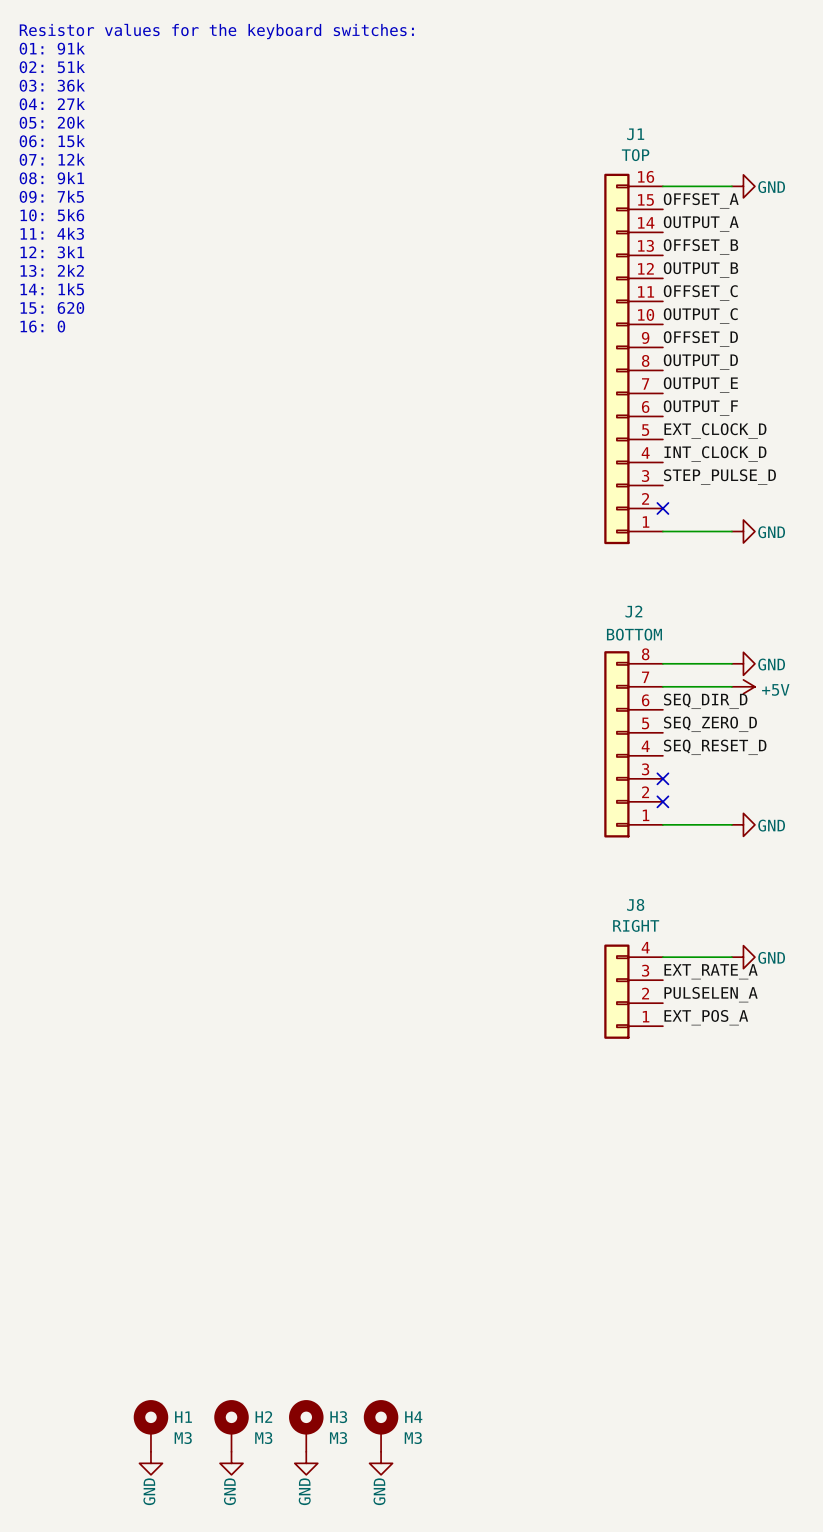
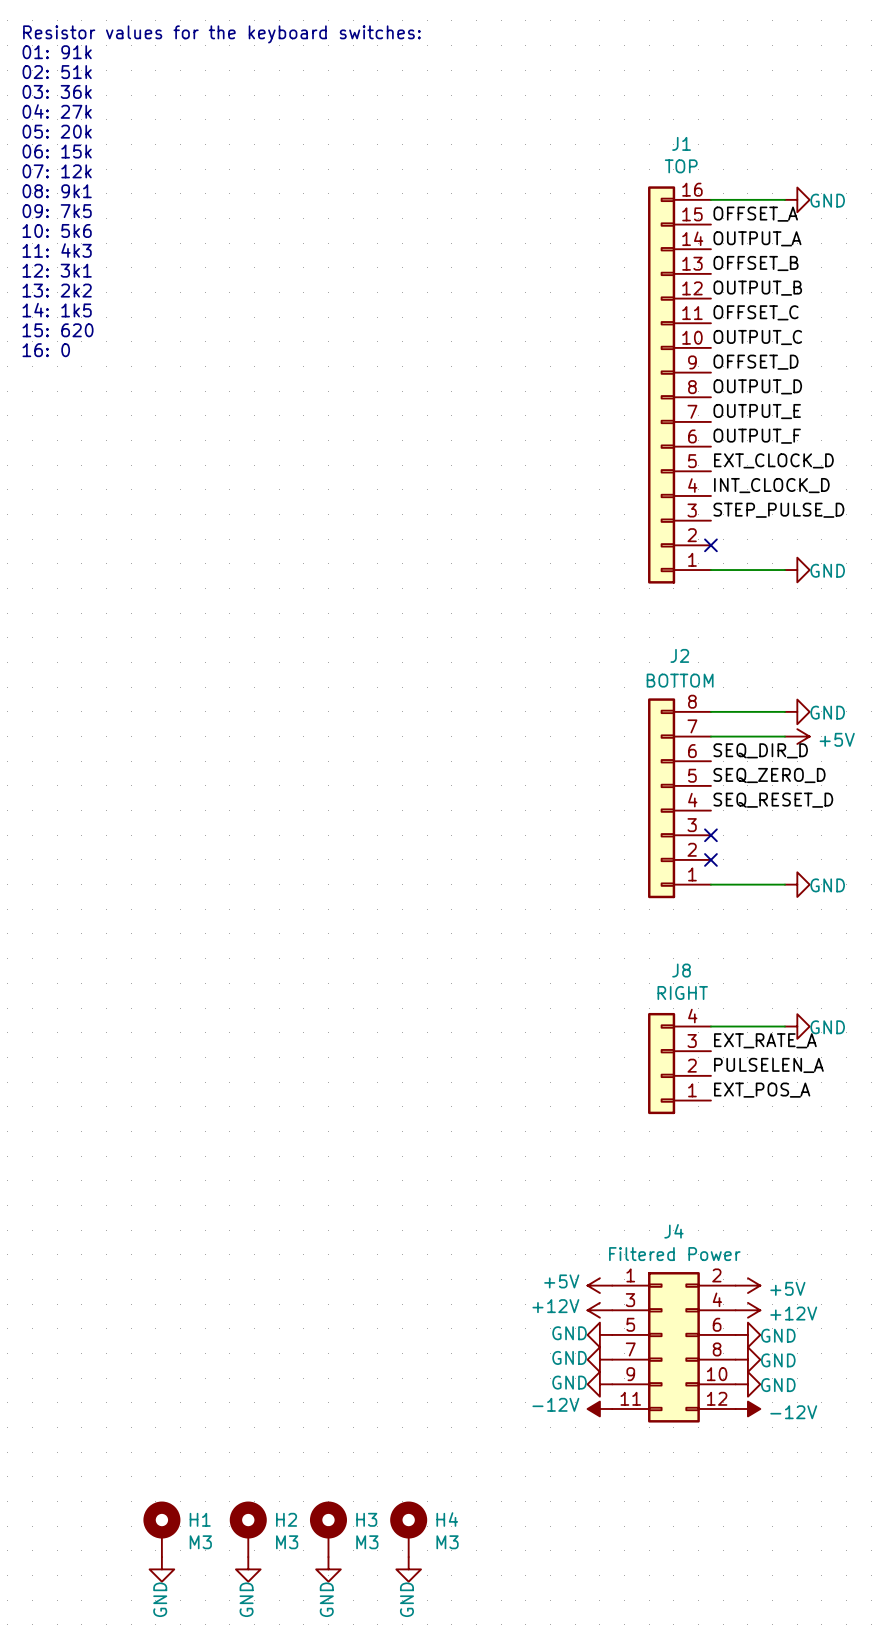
power symbol: none -> +5V (599, 1285)
power symbol: none -> +5V (747, 1285)
power symbol: none -> +12V (599, 1310)
power symbol: none -> +12V (747, 1310)
power symbol: none -> GND (599, 1334)
power symbol: none -> GND (747, 1334)
J4: none -> Filtered Power (673, 1347)
power symbol: none -> GND (599, 1359)
power symbol: none -> GND (747, 1359)
power symbol: none -> GND (599, 1384)
power symbol: none -> GND (747, 1384)
power symbol: none -> -12V (599, 1408)
power symbol: none -> -12V (747, 1408)

